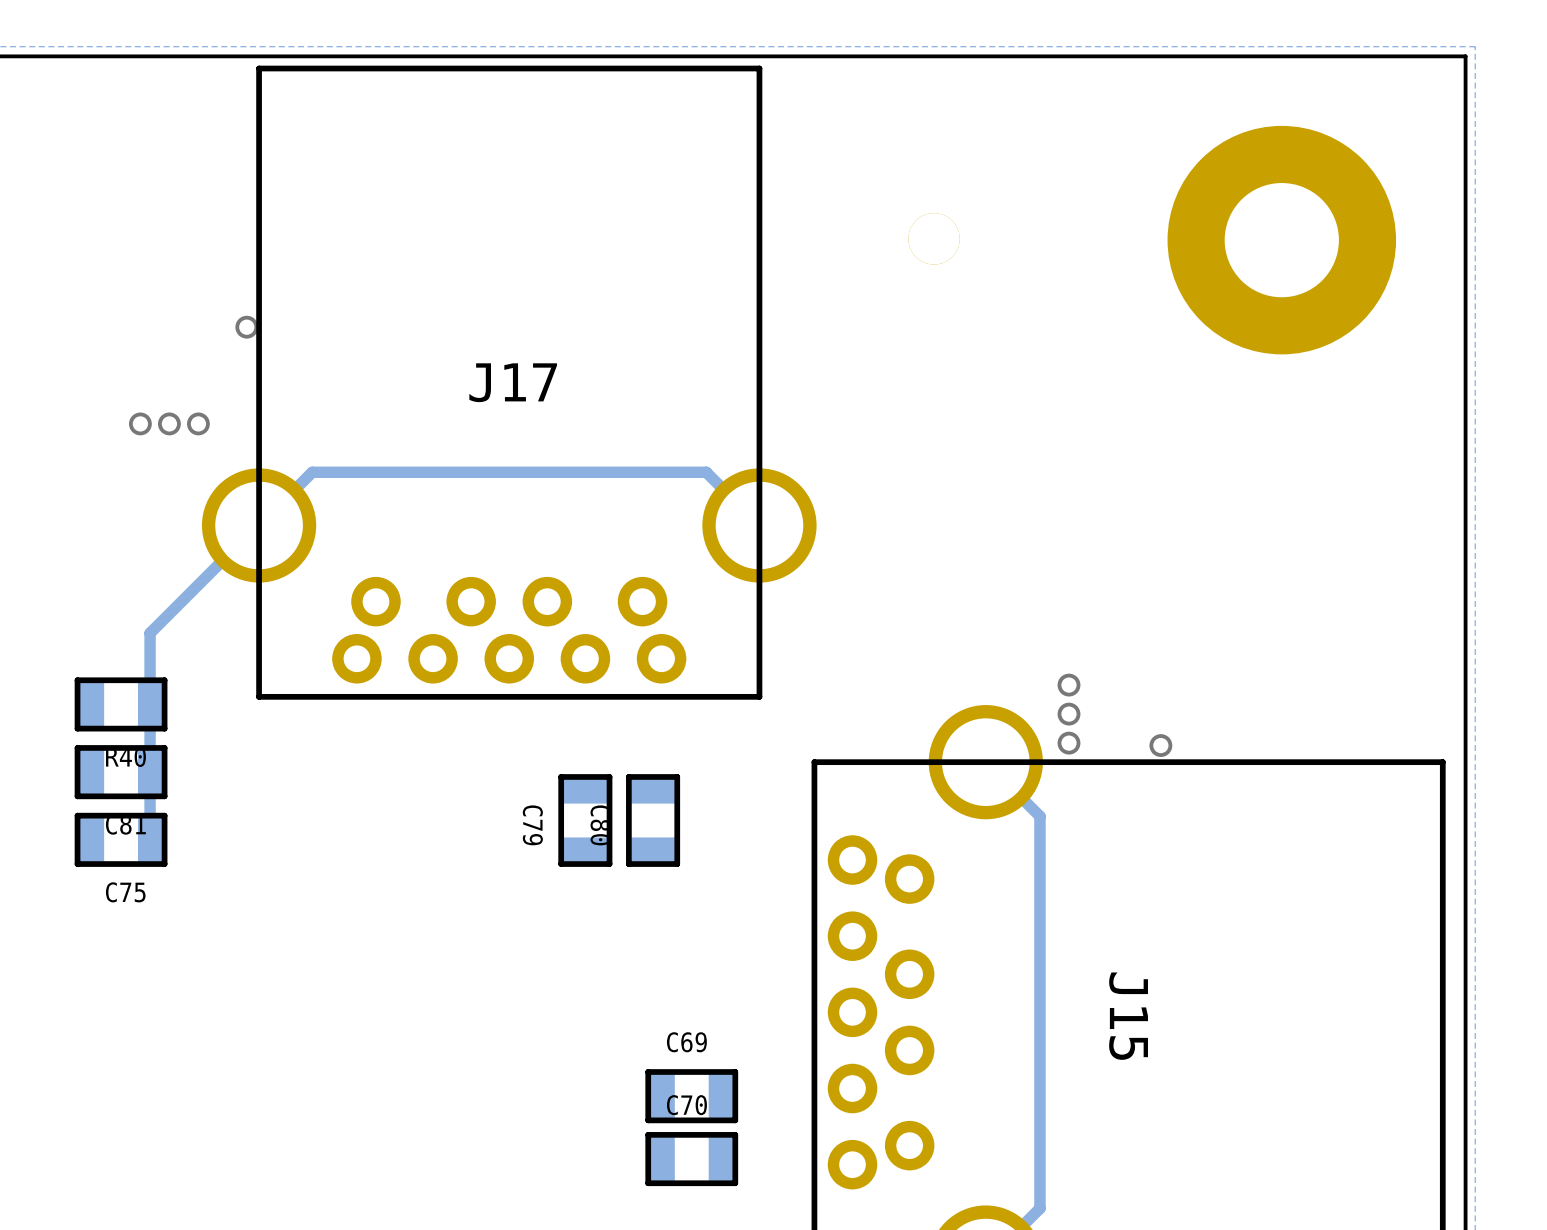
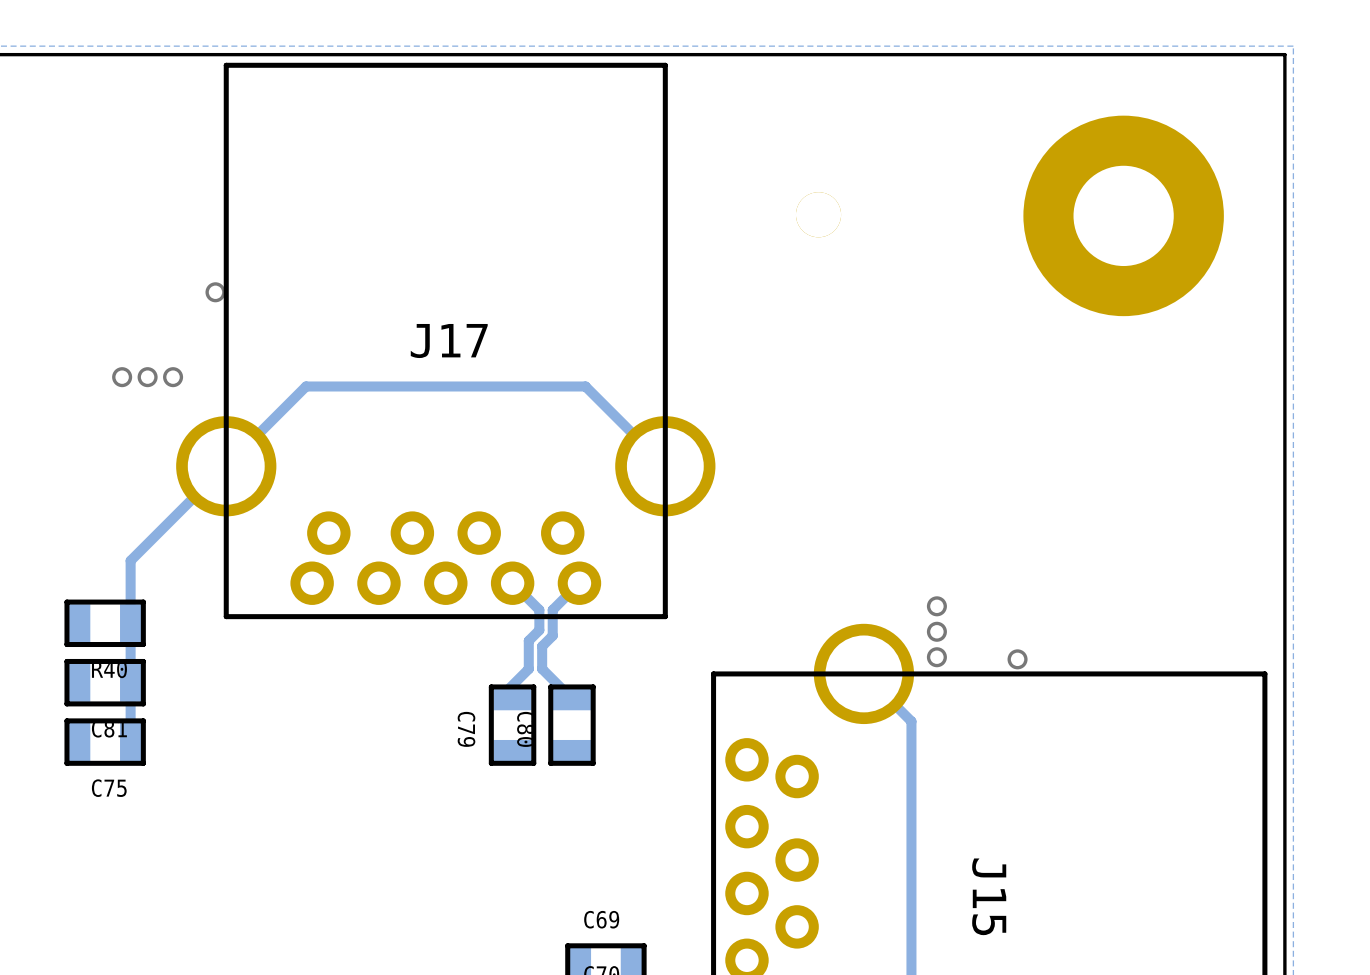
track: (706, 472) (312, 472) -> (618, 419) (585, 386) (306, 386) (272, 419)
track: none -> (512, 583) (539, 609) (539, 630) (528, 640) (528, 669) (505, 692)
track: none -> (579, 583) (552, 609) (552, 635) (542, 646) (542, 669) (565, 692)

